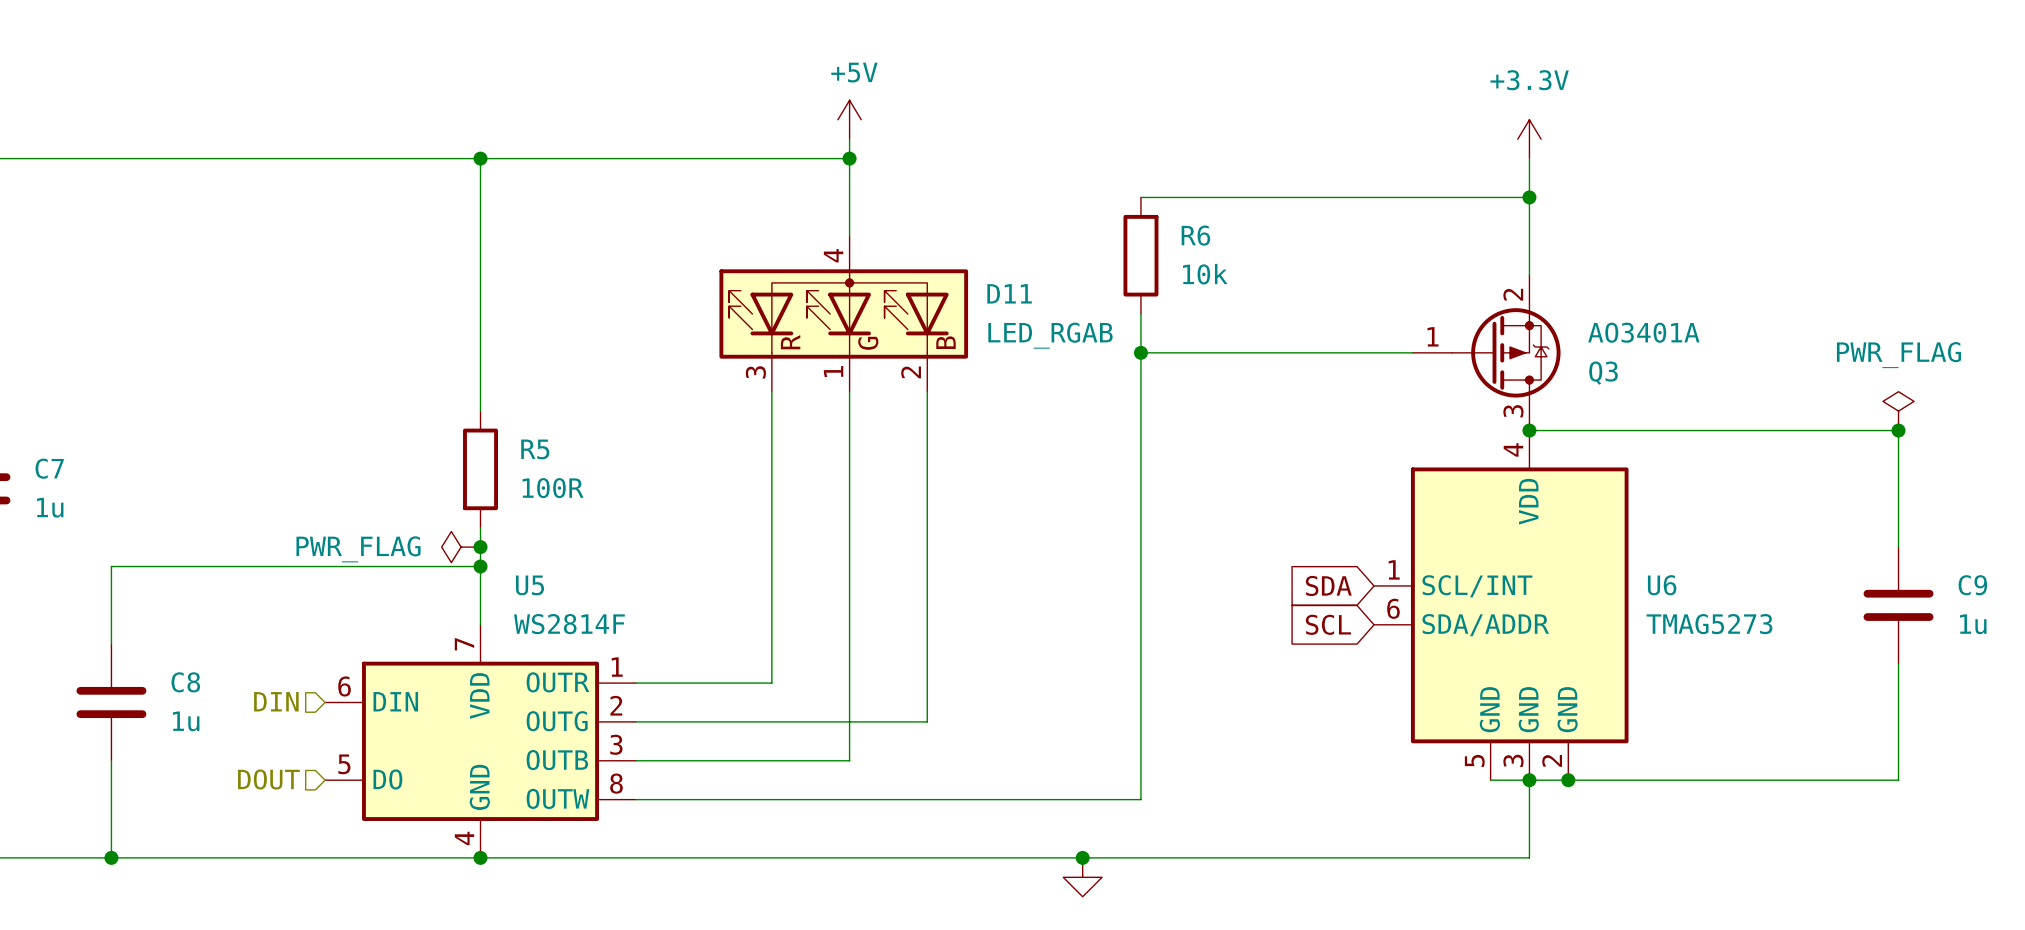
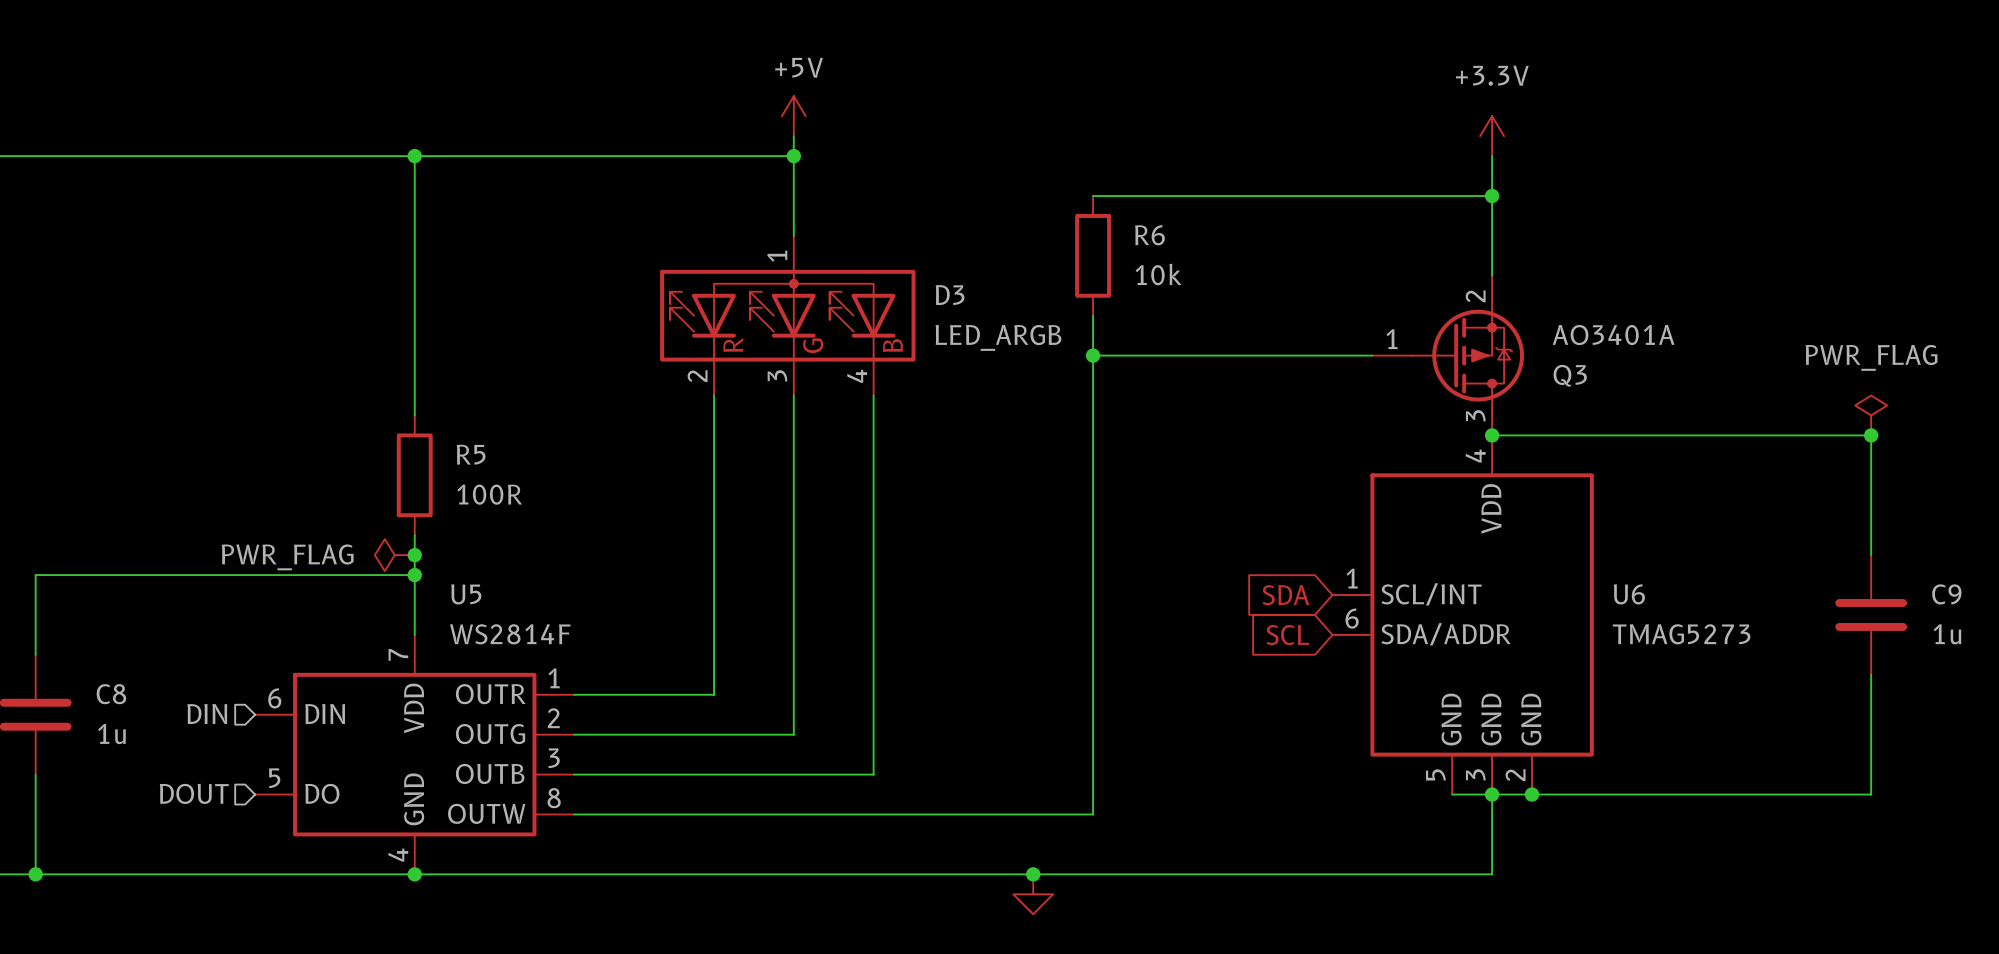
D11 pin number: 4 (833, 255) -> 1 (777, 256)
D11 name: D11 (1009, 293) -> D3 (950, 295)
D11 value: LED_RGAB (1050, 335) -> LED_ARGB (998, 337)
D11 pin number: 1 (833, 371) -> 3 (777, 375)
D11 pin number: 3 (755, 372) -> 2 (697, 376)
D11 pin number: 2 (911, 372) -> 4 (857, 376)
wire: (927, 721) (849, 721) (849, 760) -> (873, 734) (873, 774) (793, 774)

